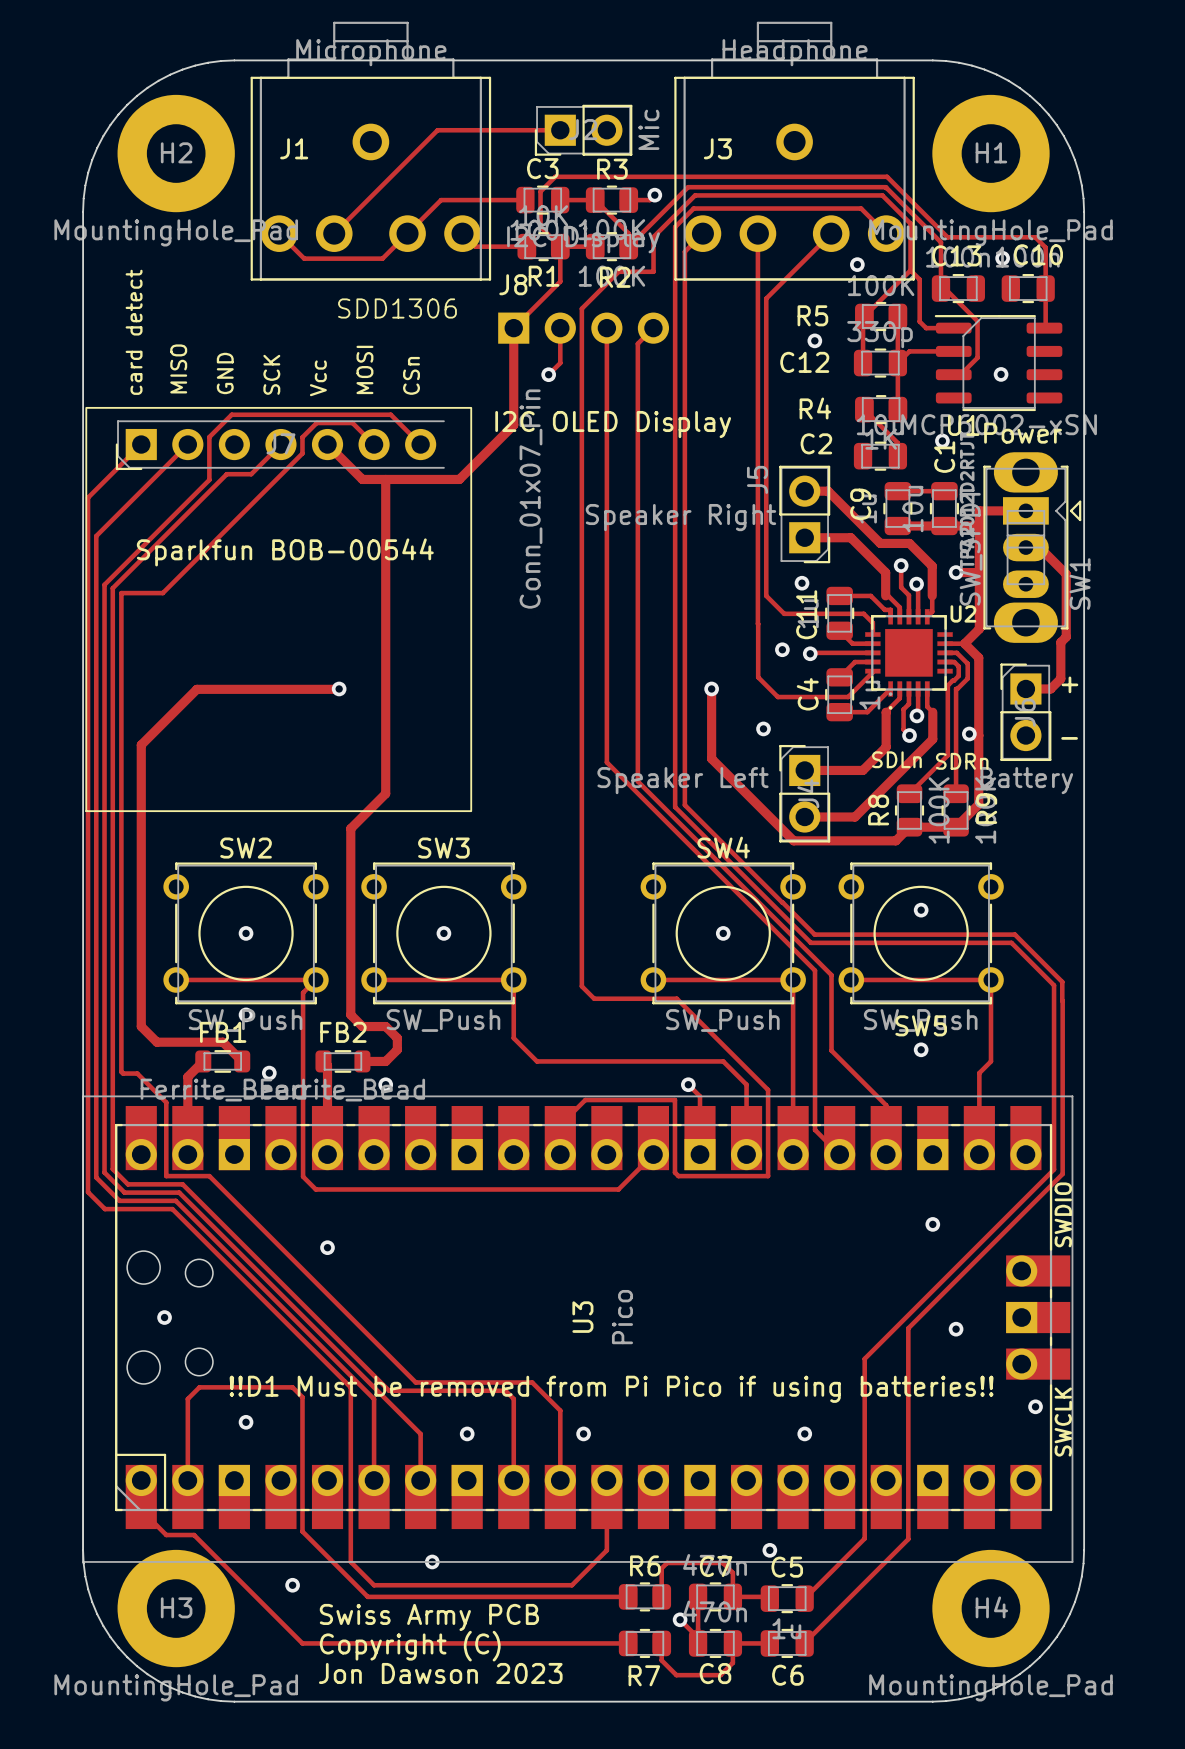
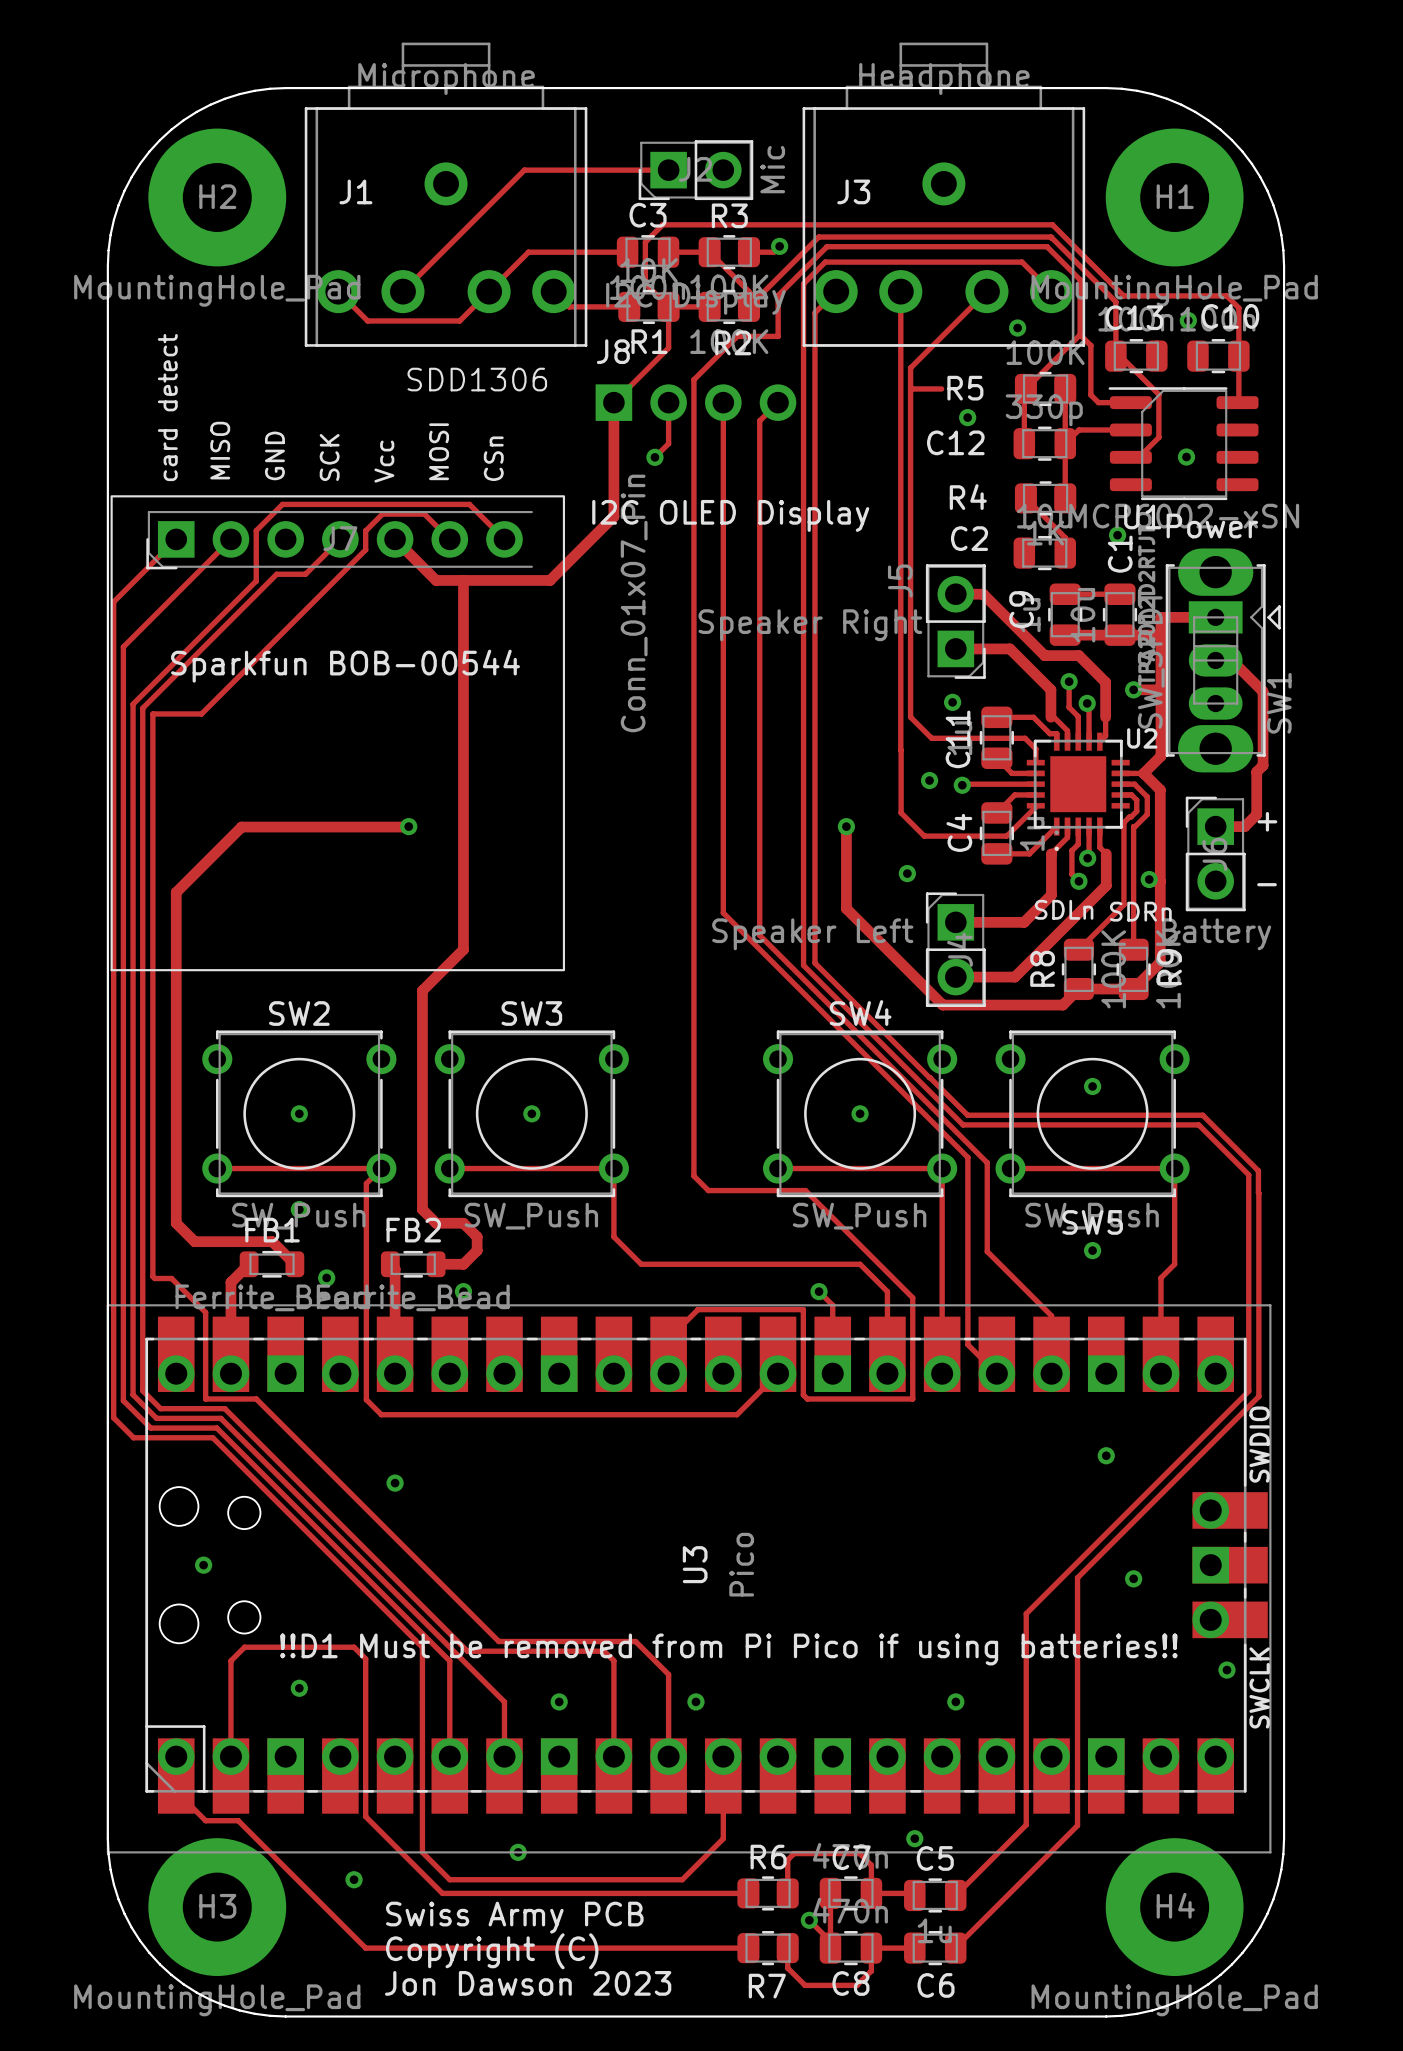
track: none -> (910, 388) (941, 388)

